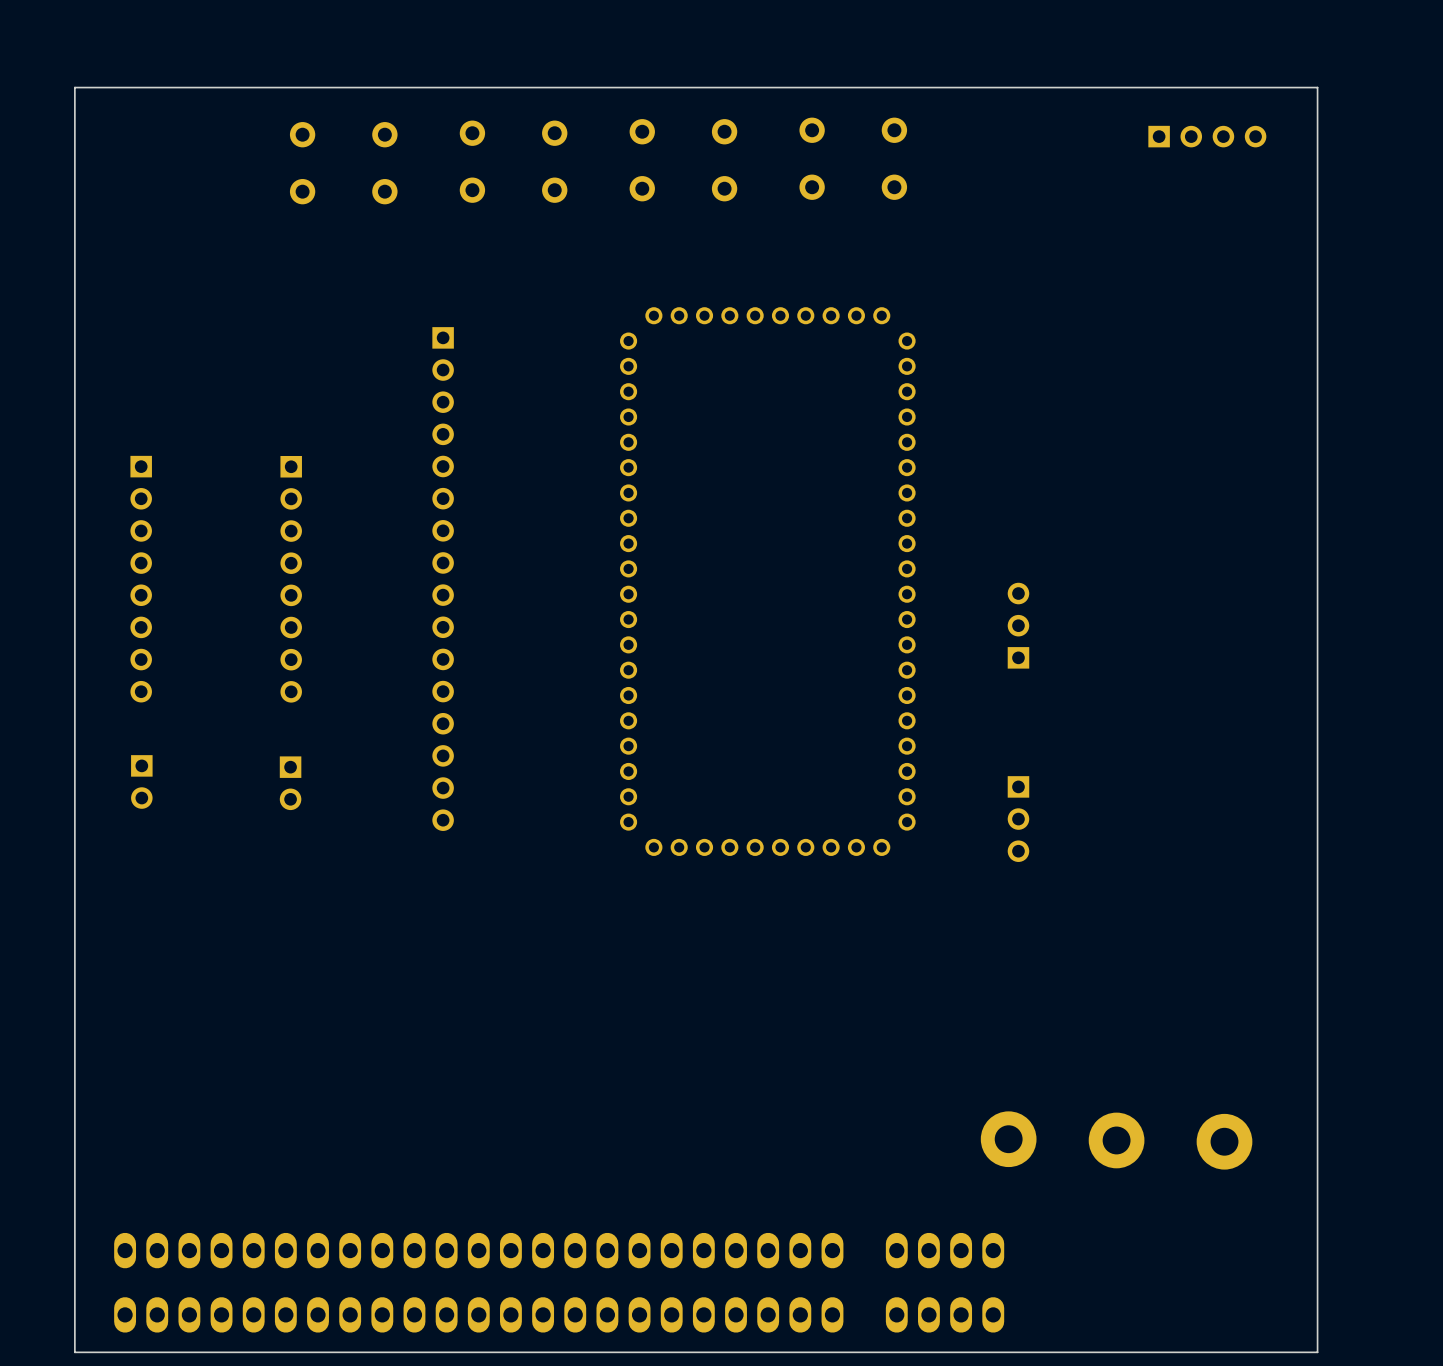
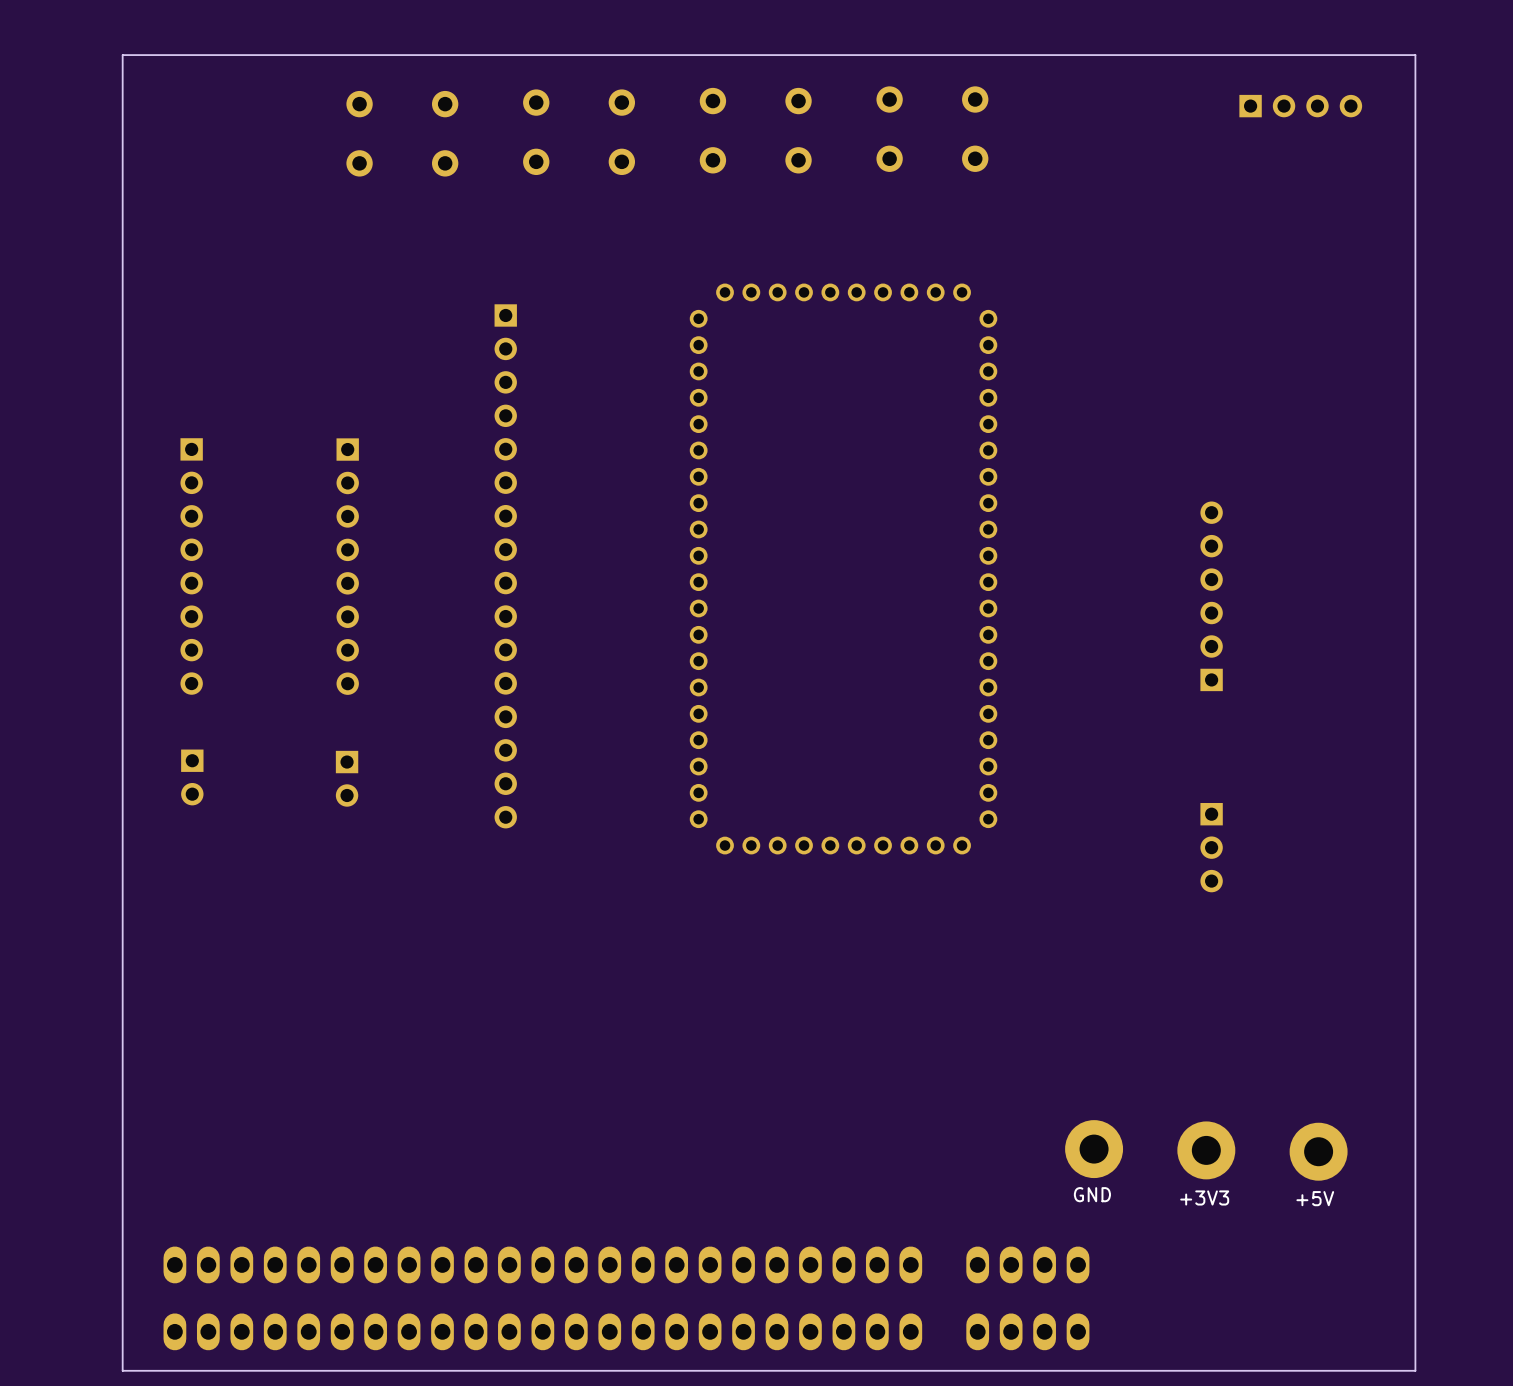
part: none -> (1211, 596)
part: (1018, 625) -> none
part position: (1018, 819) -> (1211, 847)
text: none -> GND (1092, 1194)
text: none -> +3V3 (1204, 1197)
text: none -> +5V (1315, 1198)

